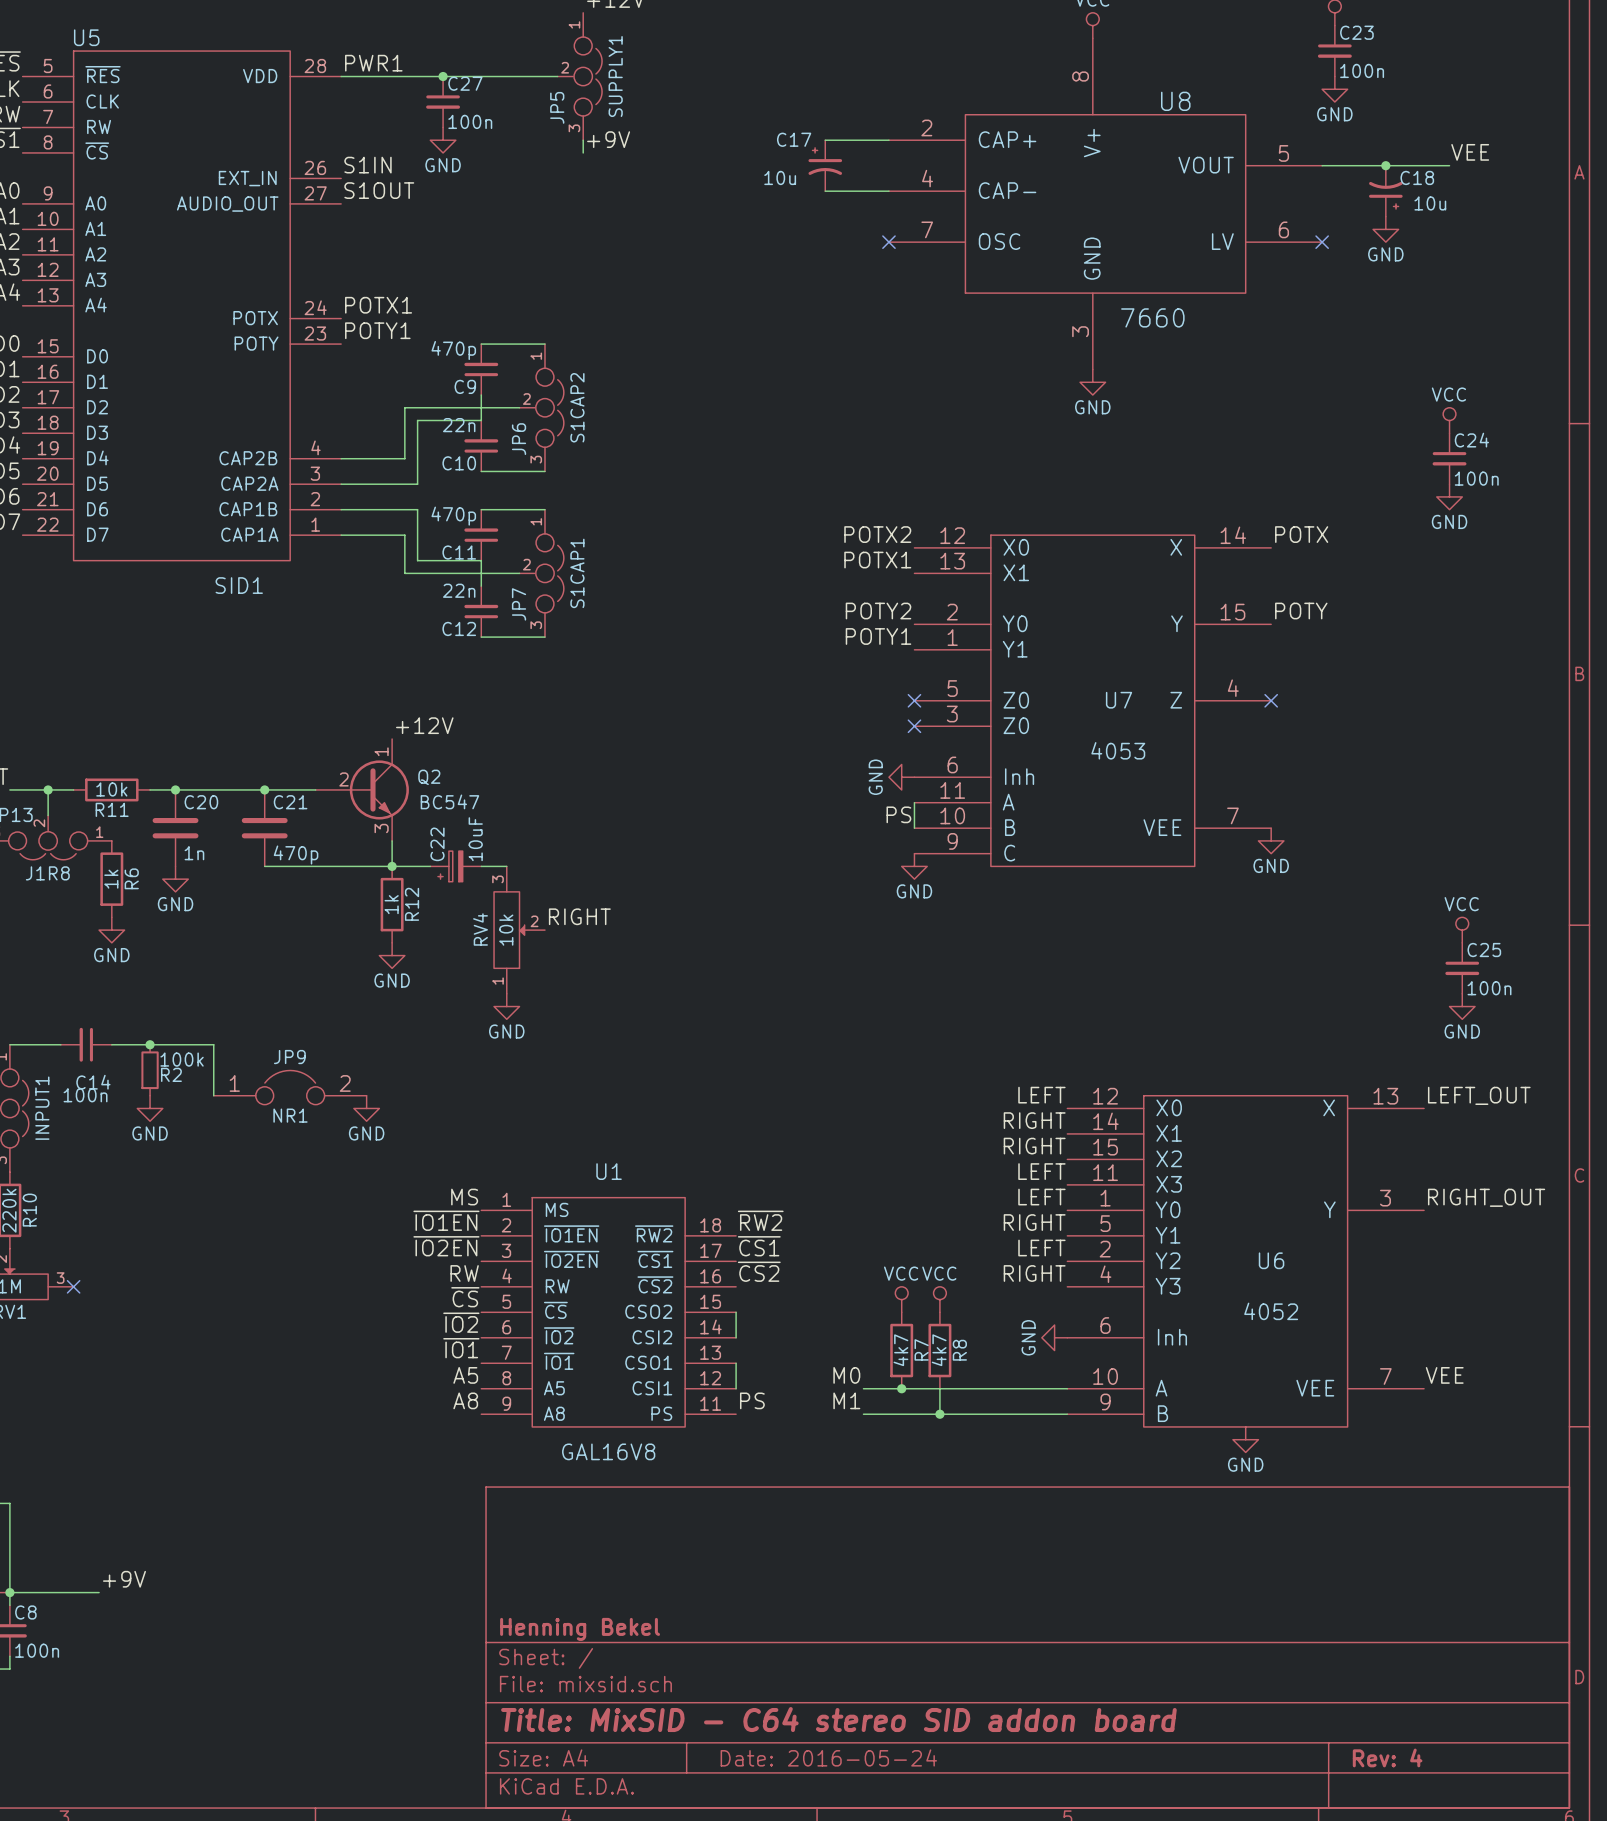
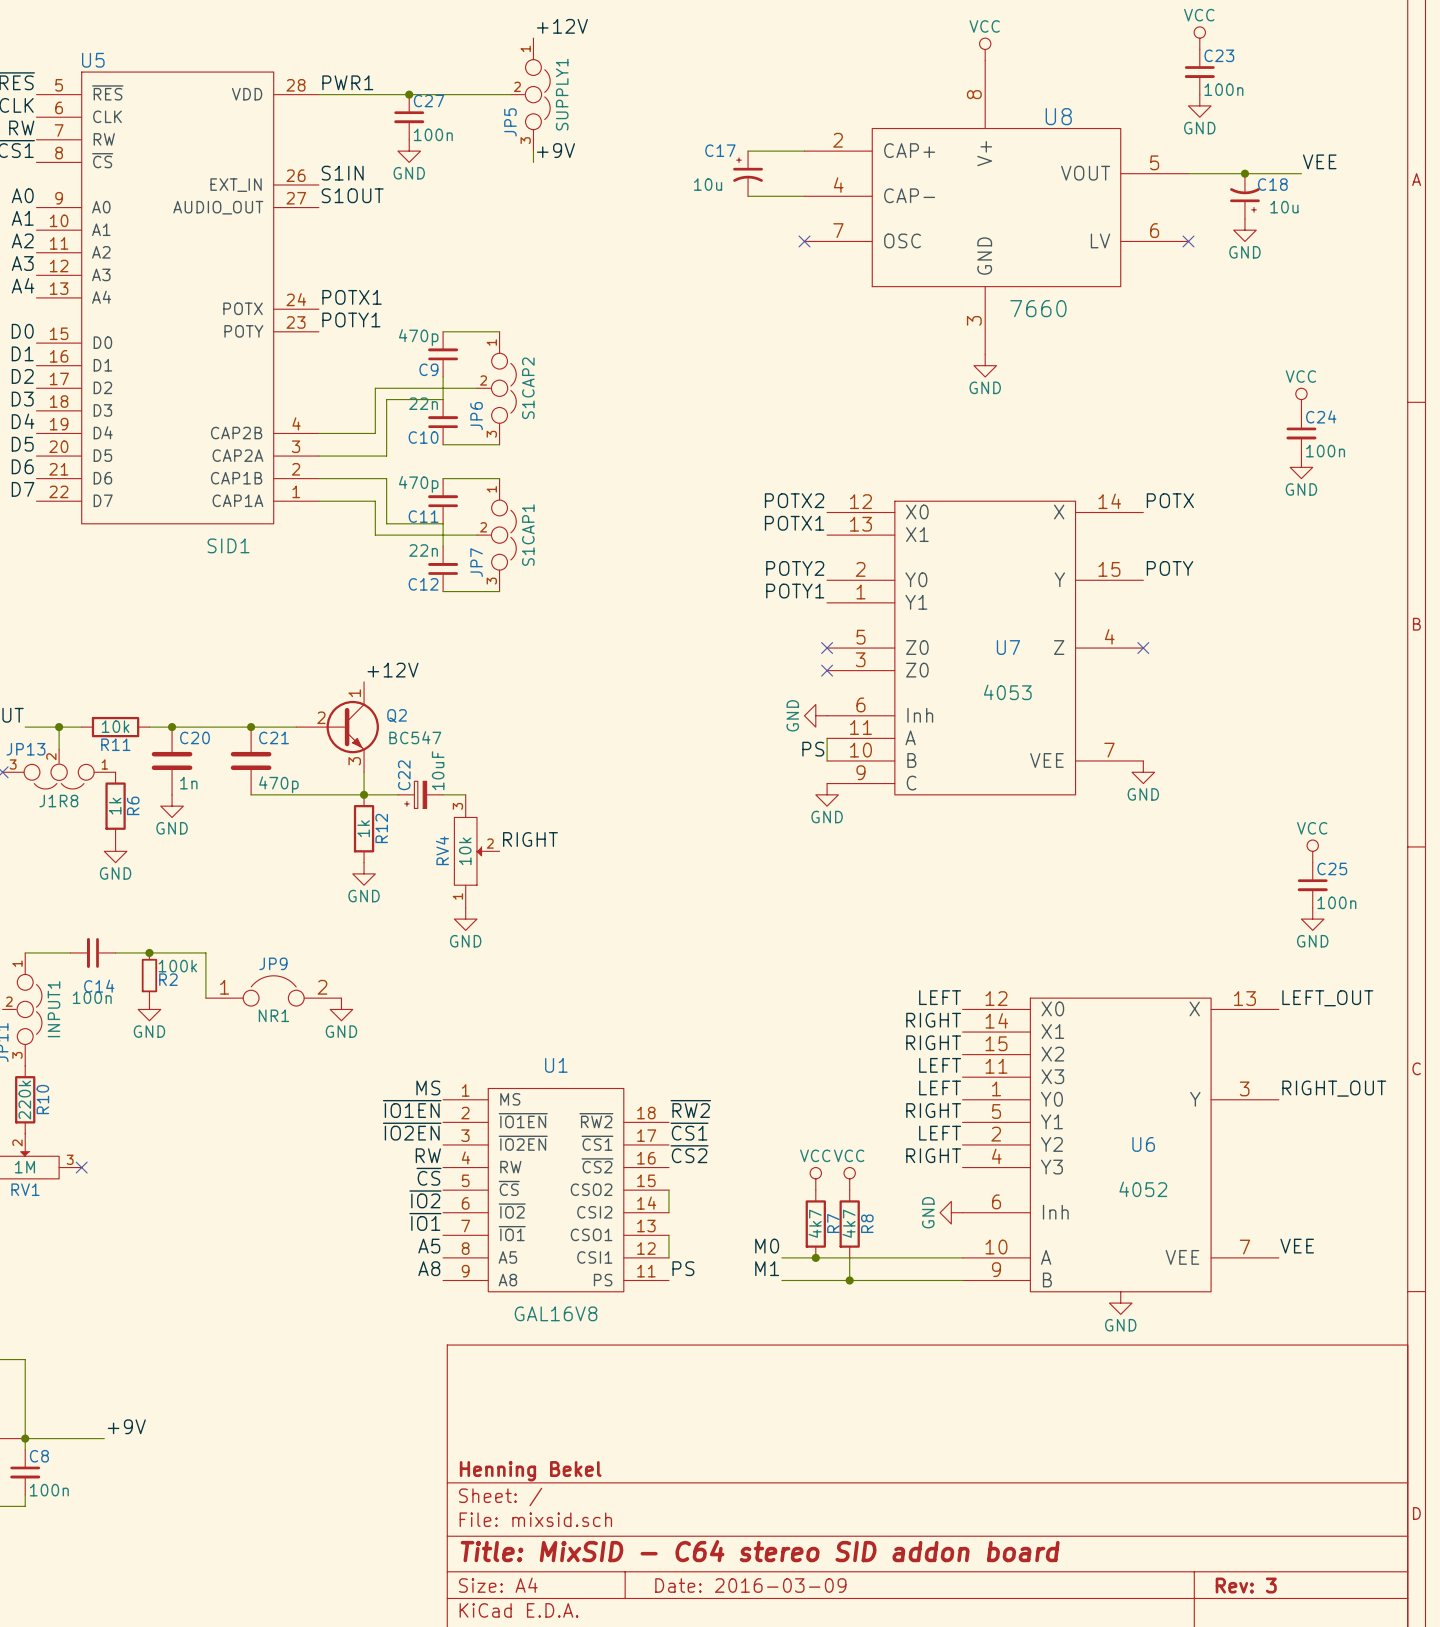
title block: Date: 2016-05-24 (828, 1757) -> Date: 2016-03-09 (750, 1585)
title block: Rev: 4 (1387, 1757) -> Rev: 3 (1246, 1585)

